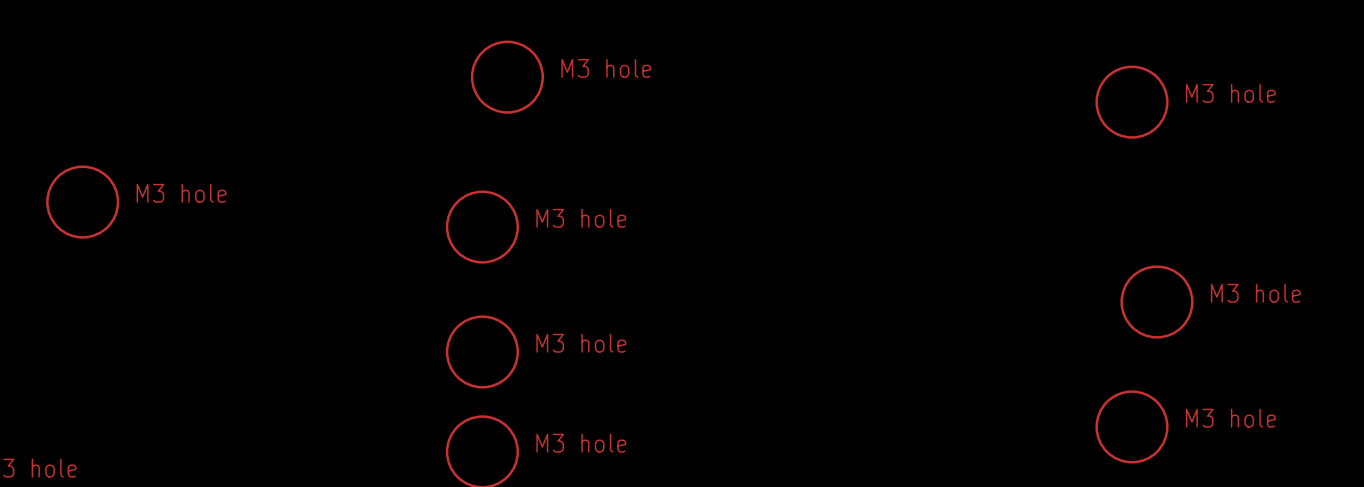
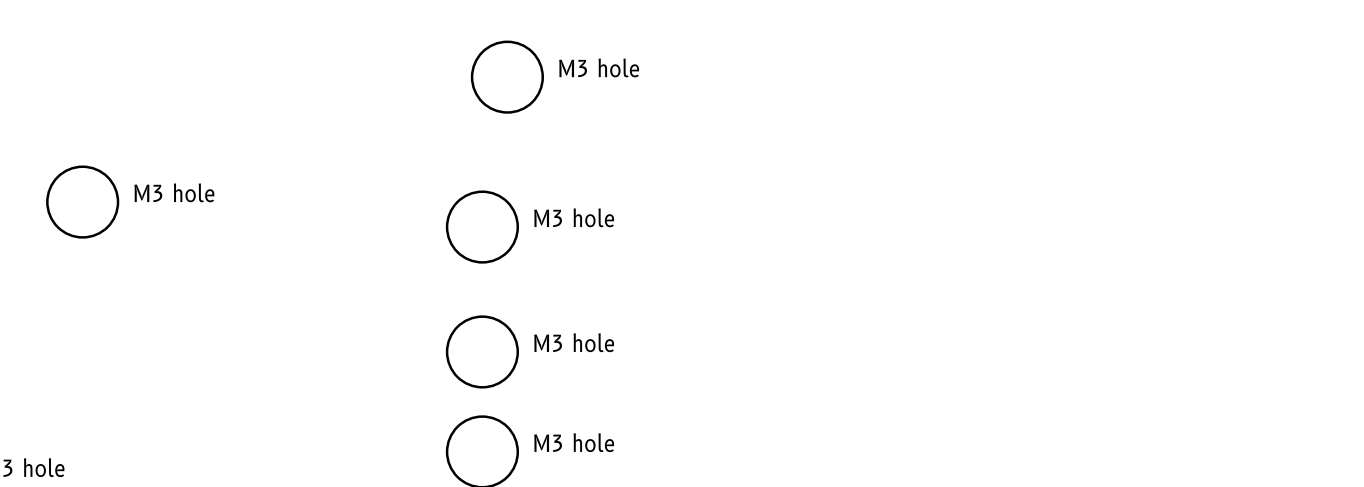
part: (1132, 102) -> none
part: (1156, 302) -> none
part: (1132, 426) -> none

